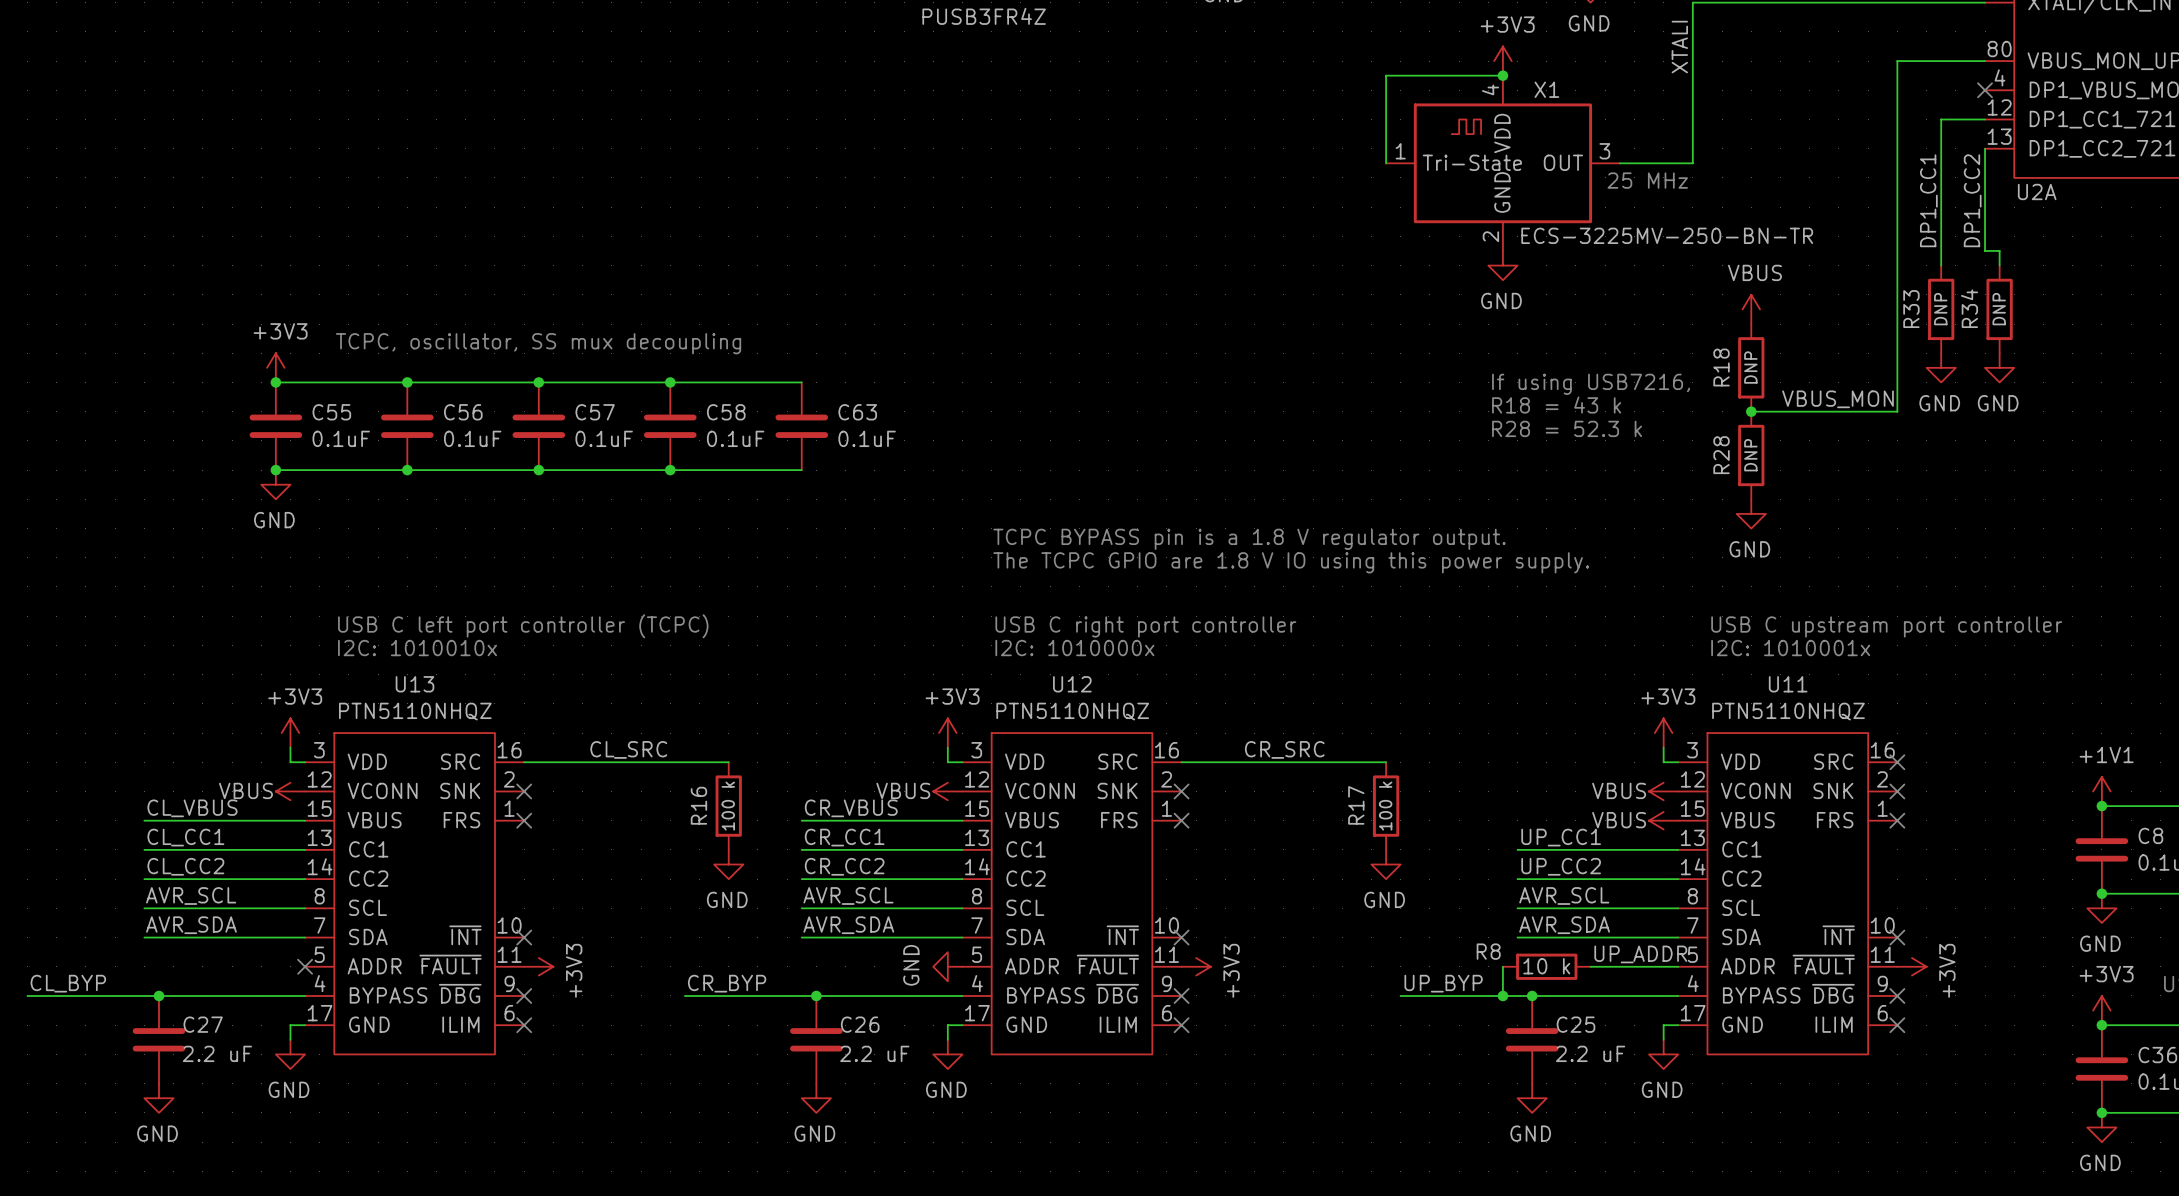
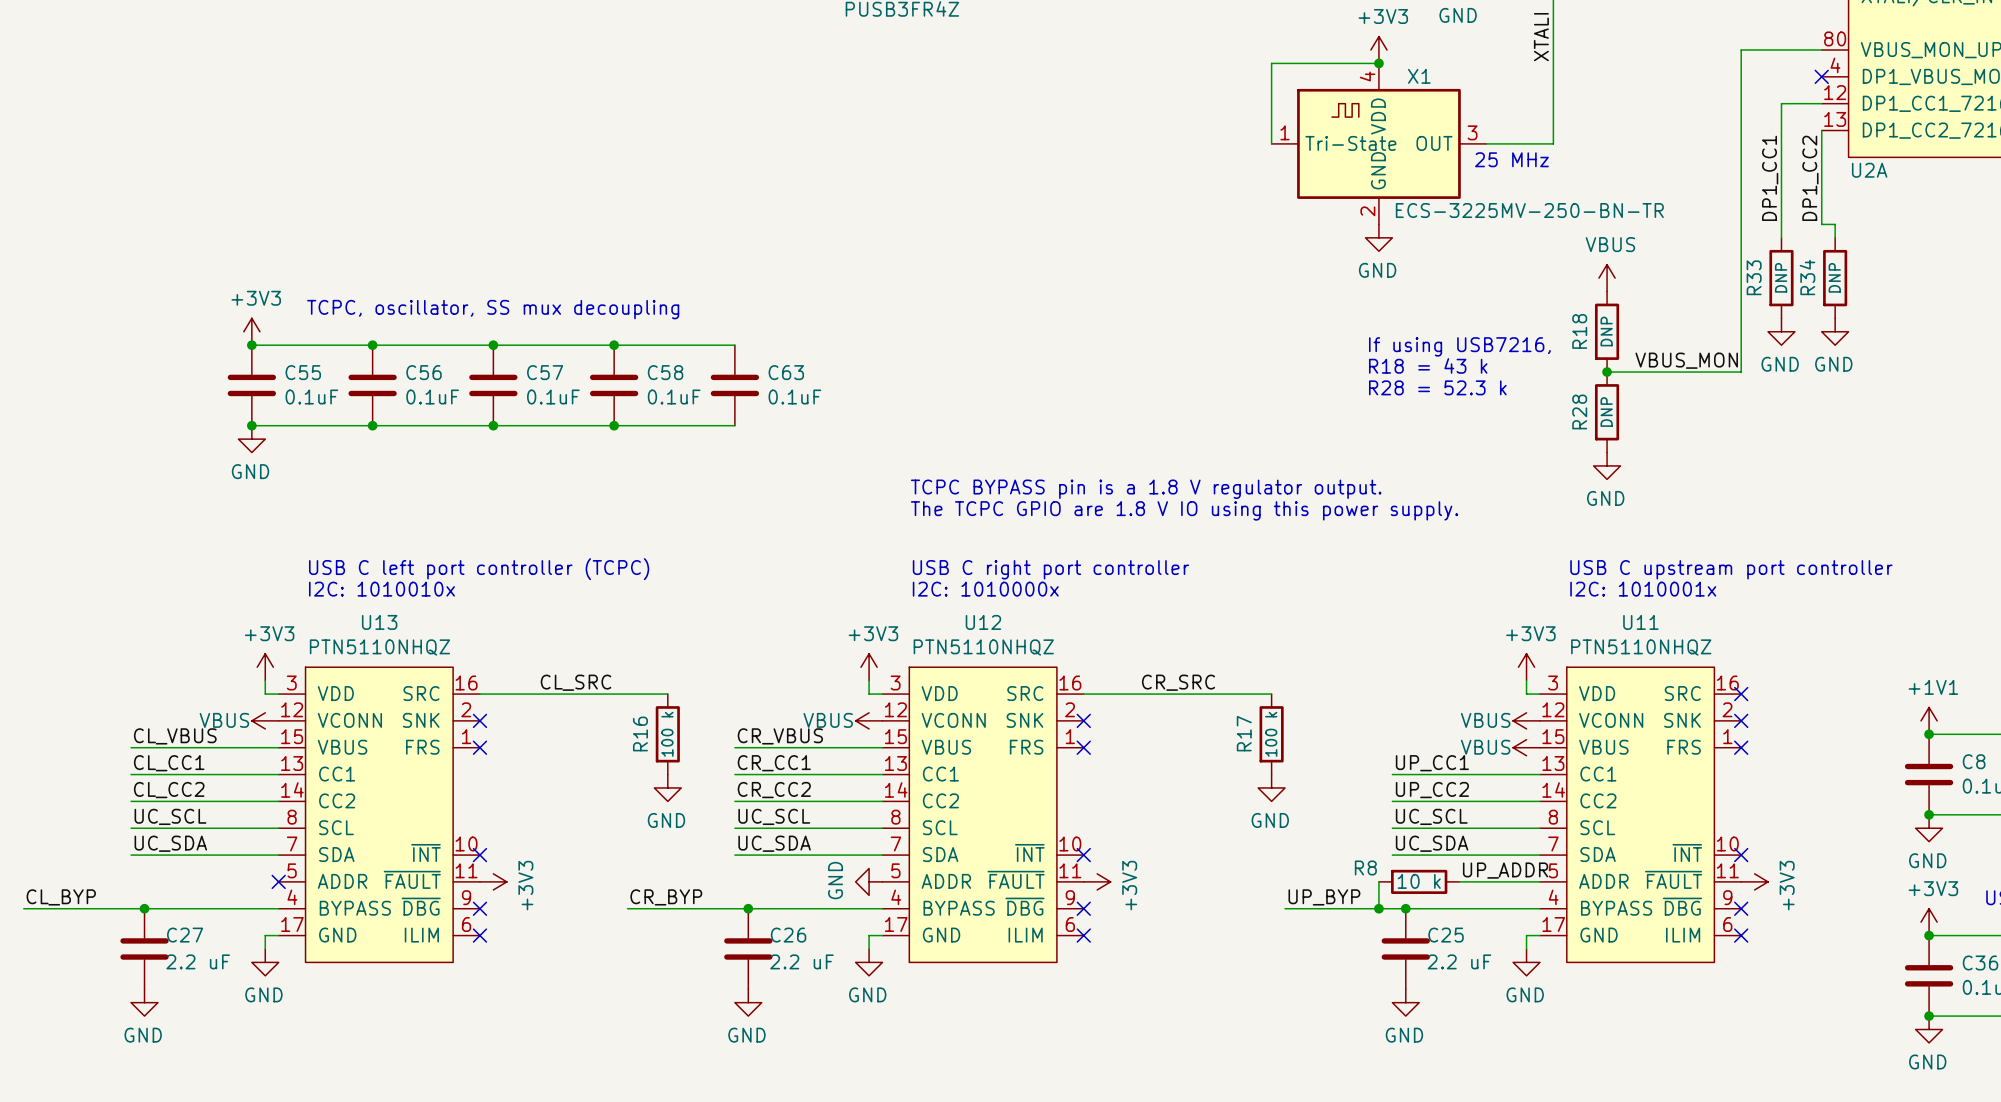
label: AVR_SCL (191, 896) -> UC_SCL (170, 816)
label: AVR_SCL (848, 896) -> UC_SCL (774, 816)
label: AVR_SCL (1564, 896) -> UC_SCL (1431, 816)
label: AVR_SDA (191, 925) -> UC_SDA (170, 843)
label: AVR_SDA (848, 925) -> UC_SDA (774, 843)
label: AVR_SDA (1564, 925) -> UC_SDA (1432, 843)

